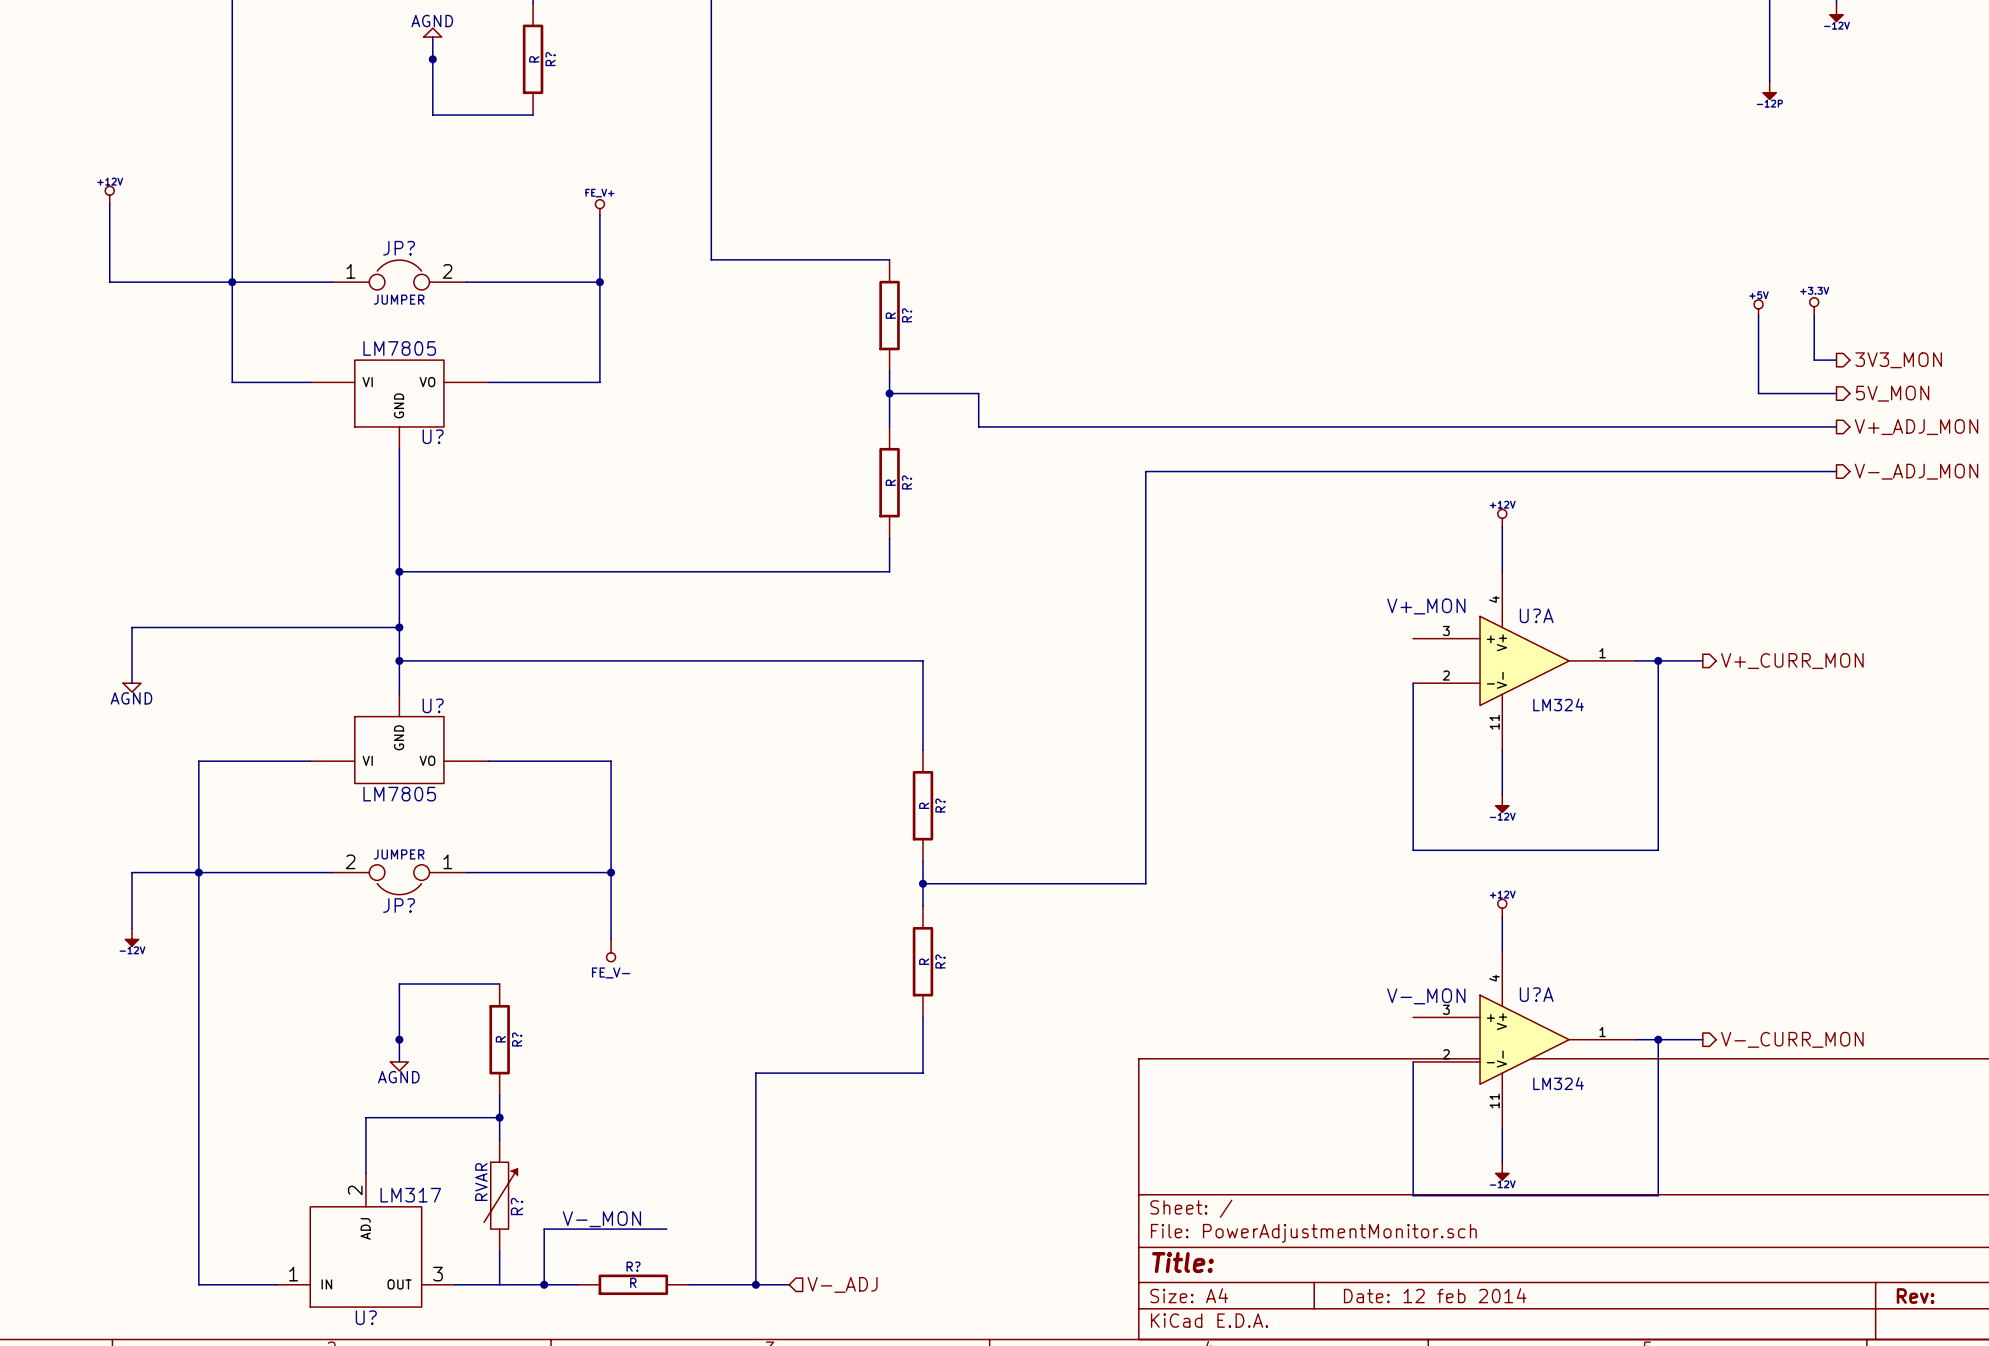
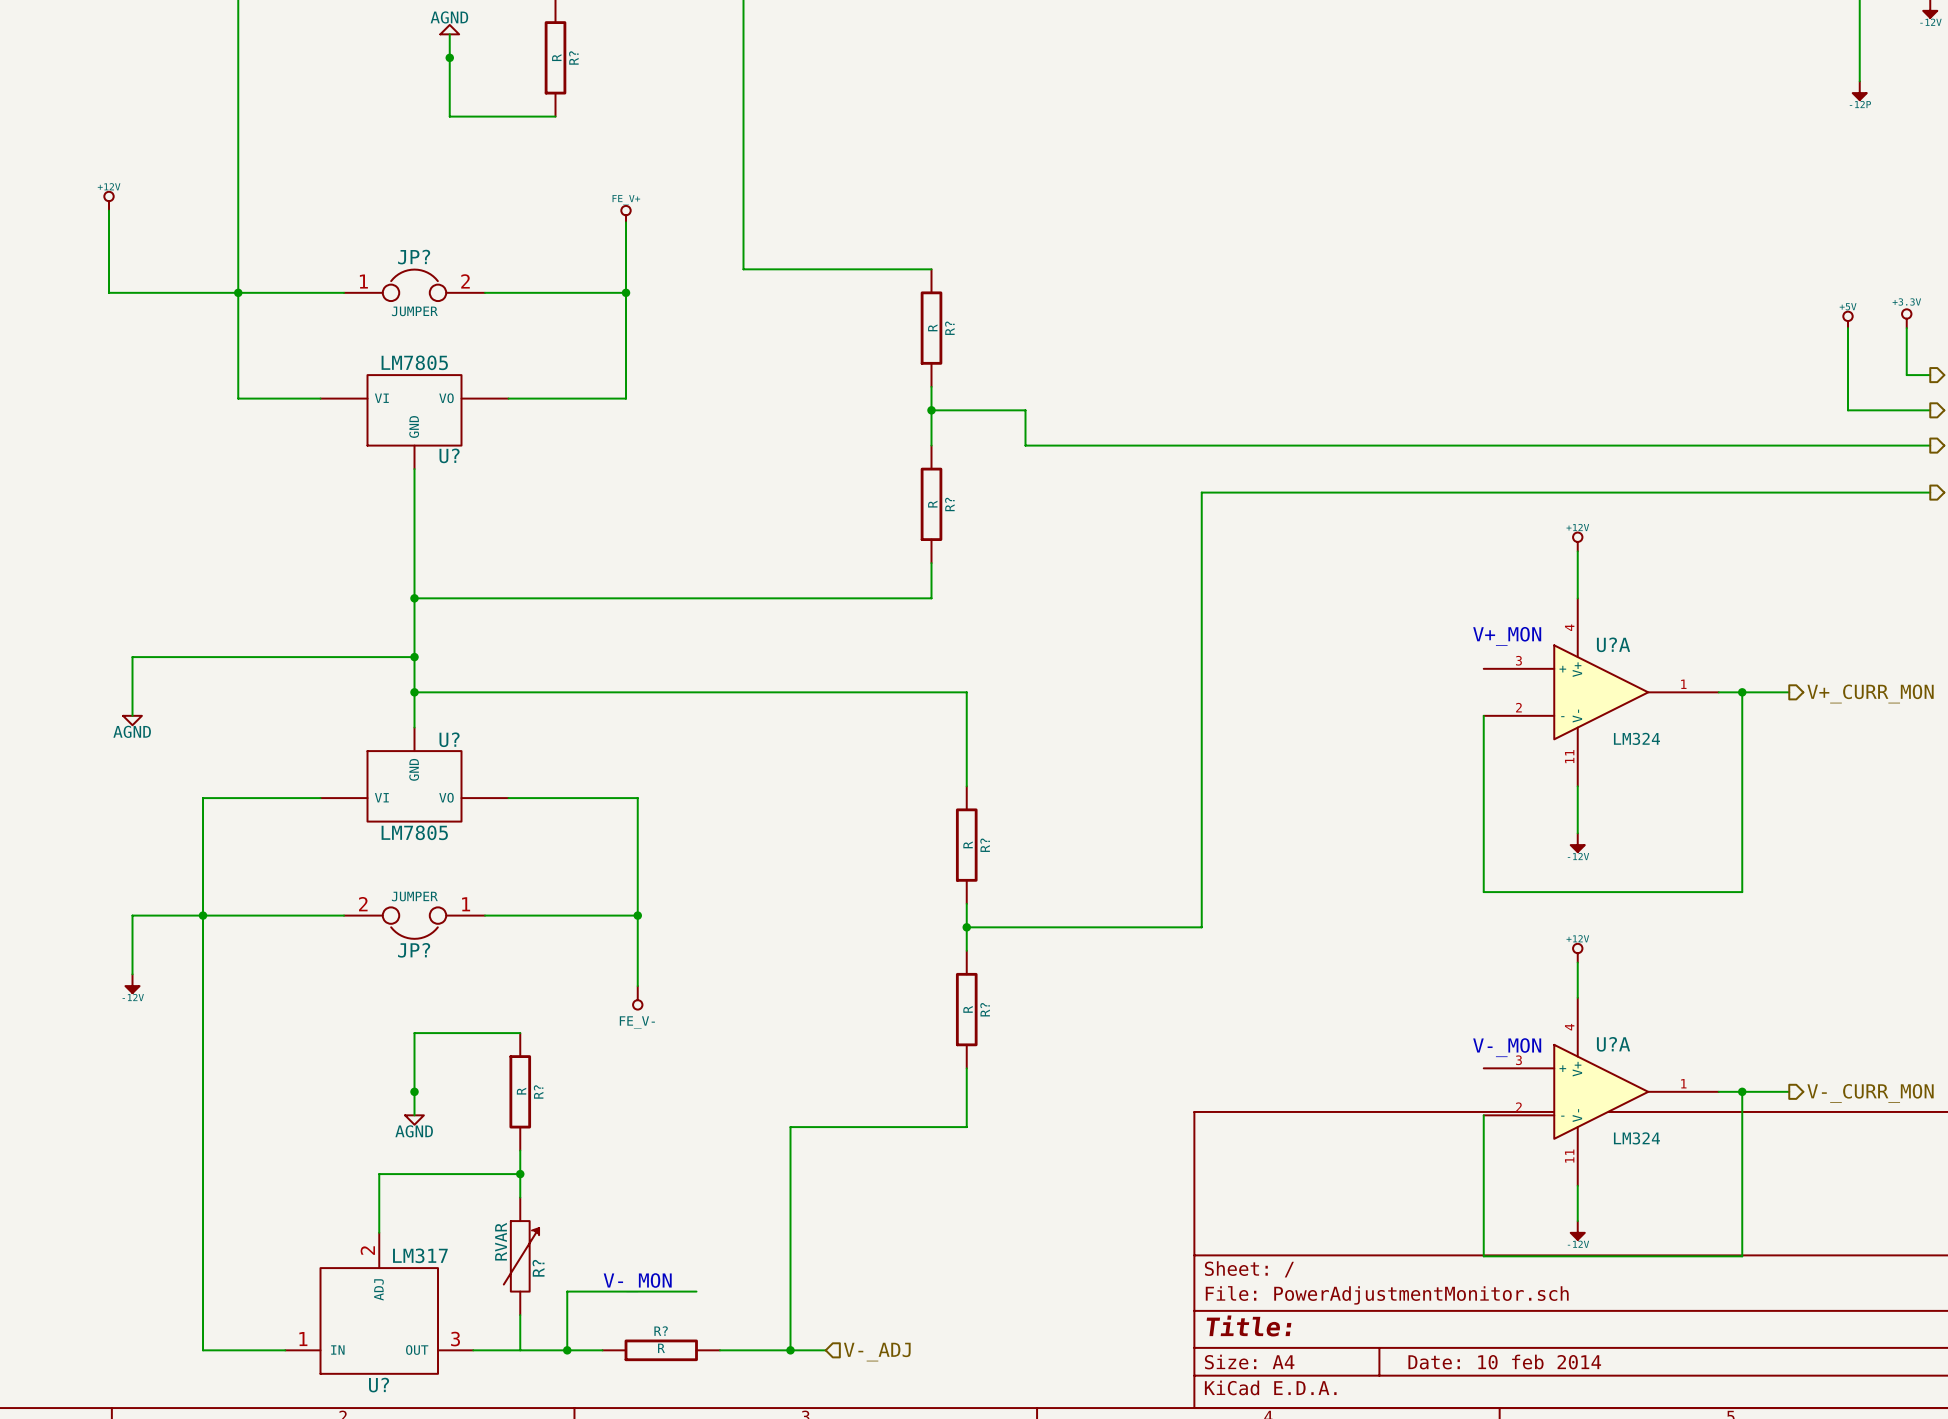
title block: Date: 12 feb 2014 (1435, 1295) -> Date: 10 feb 2014 (1504, 1362)

